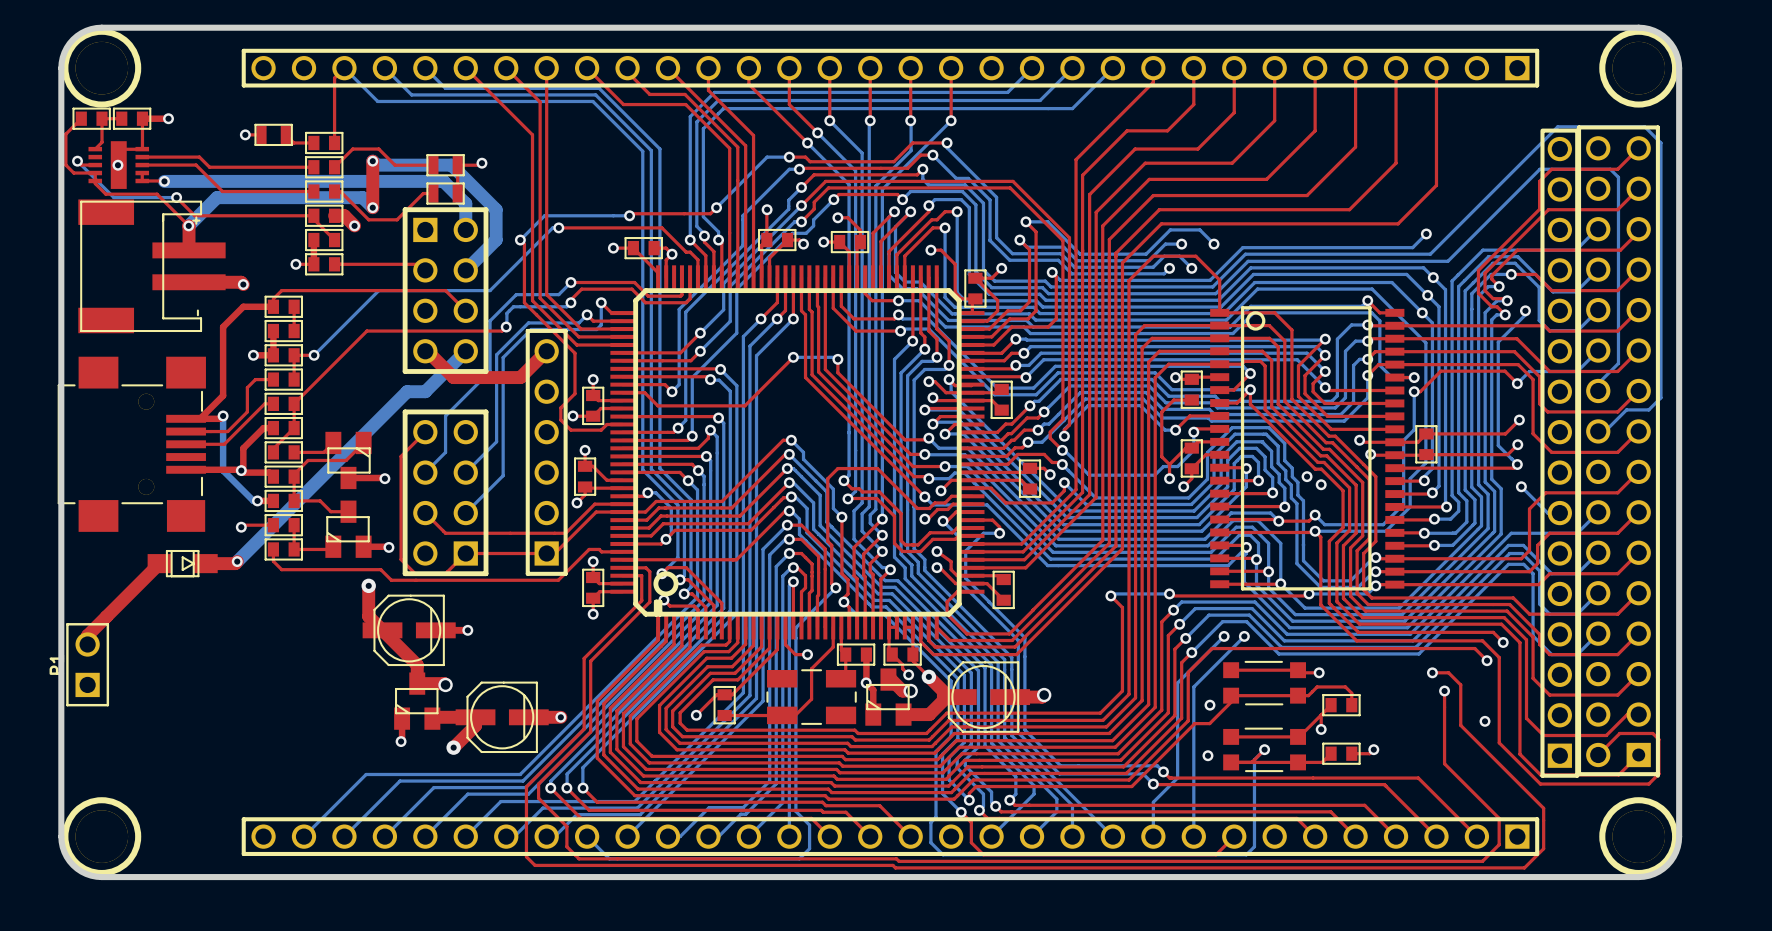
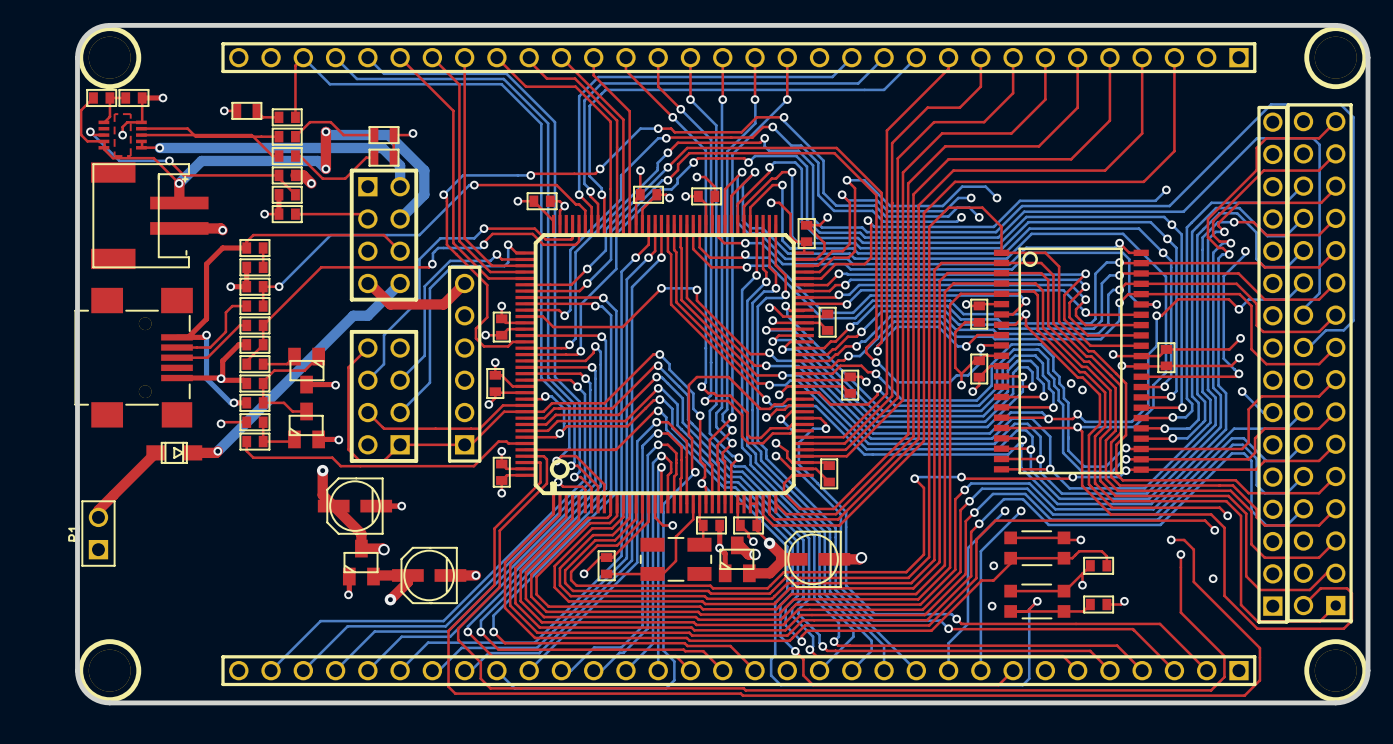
top zone outline: none -> (114, 114) (130, 114) (130, 156) (114, 156) (114, 114)
part footprint: [88, 141, 150, 189] -> [98, 120, 147, 150]
top track: (142, 165) (196, 165) (222, 191) (306, 191) -> (141, 135) (251, 135) (272, 156)

